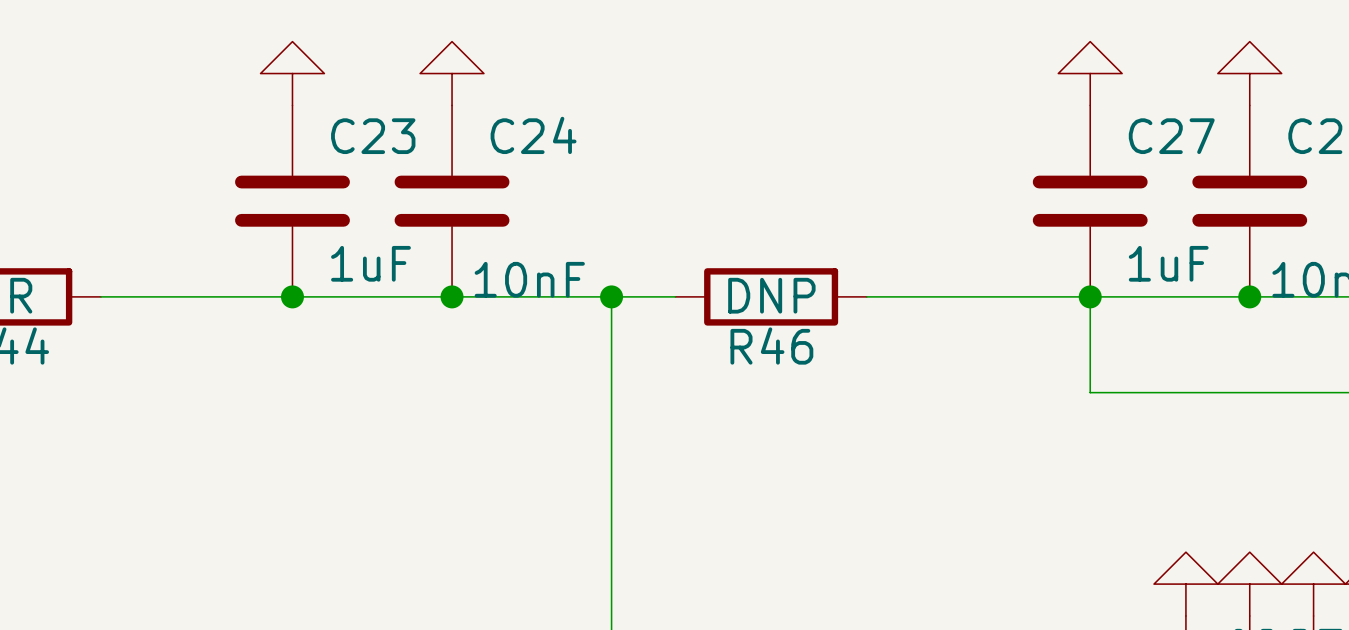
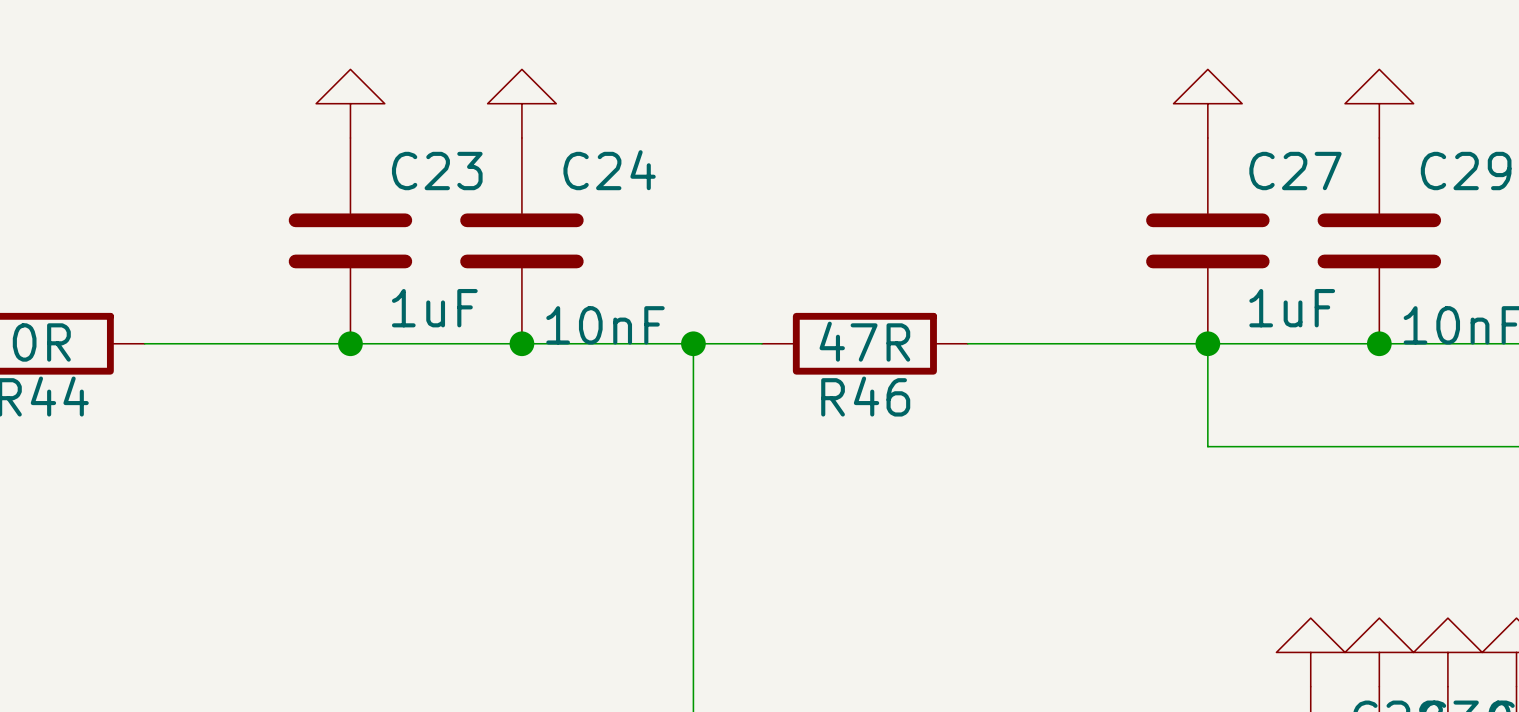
R46 value: DNP (771, 295) -> 47R (864, 341)

